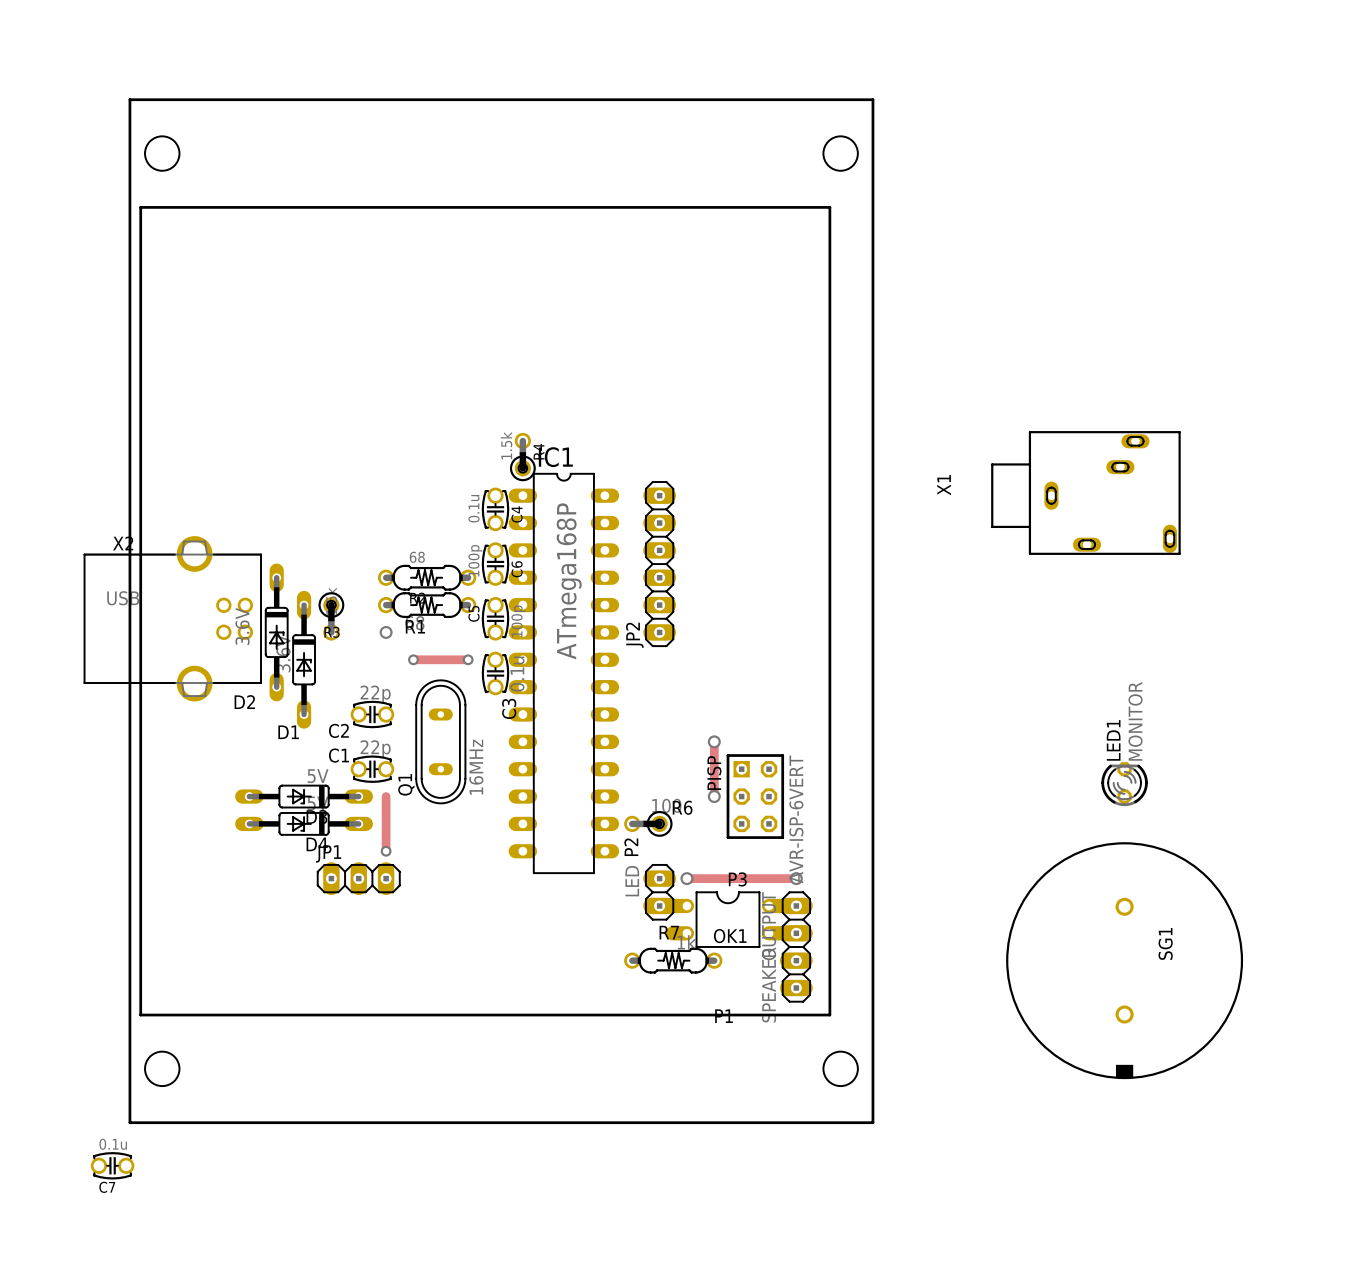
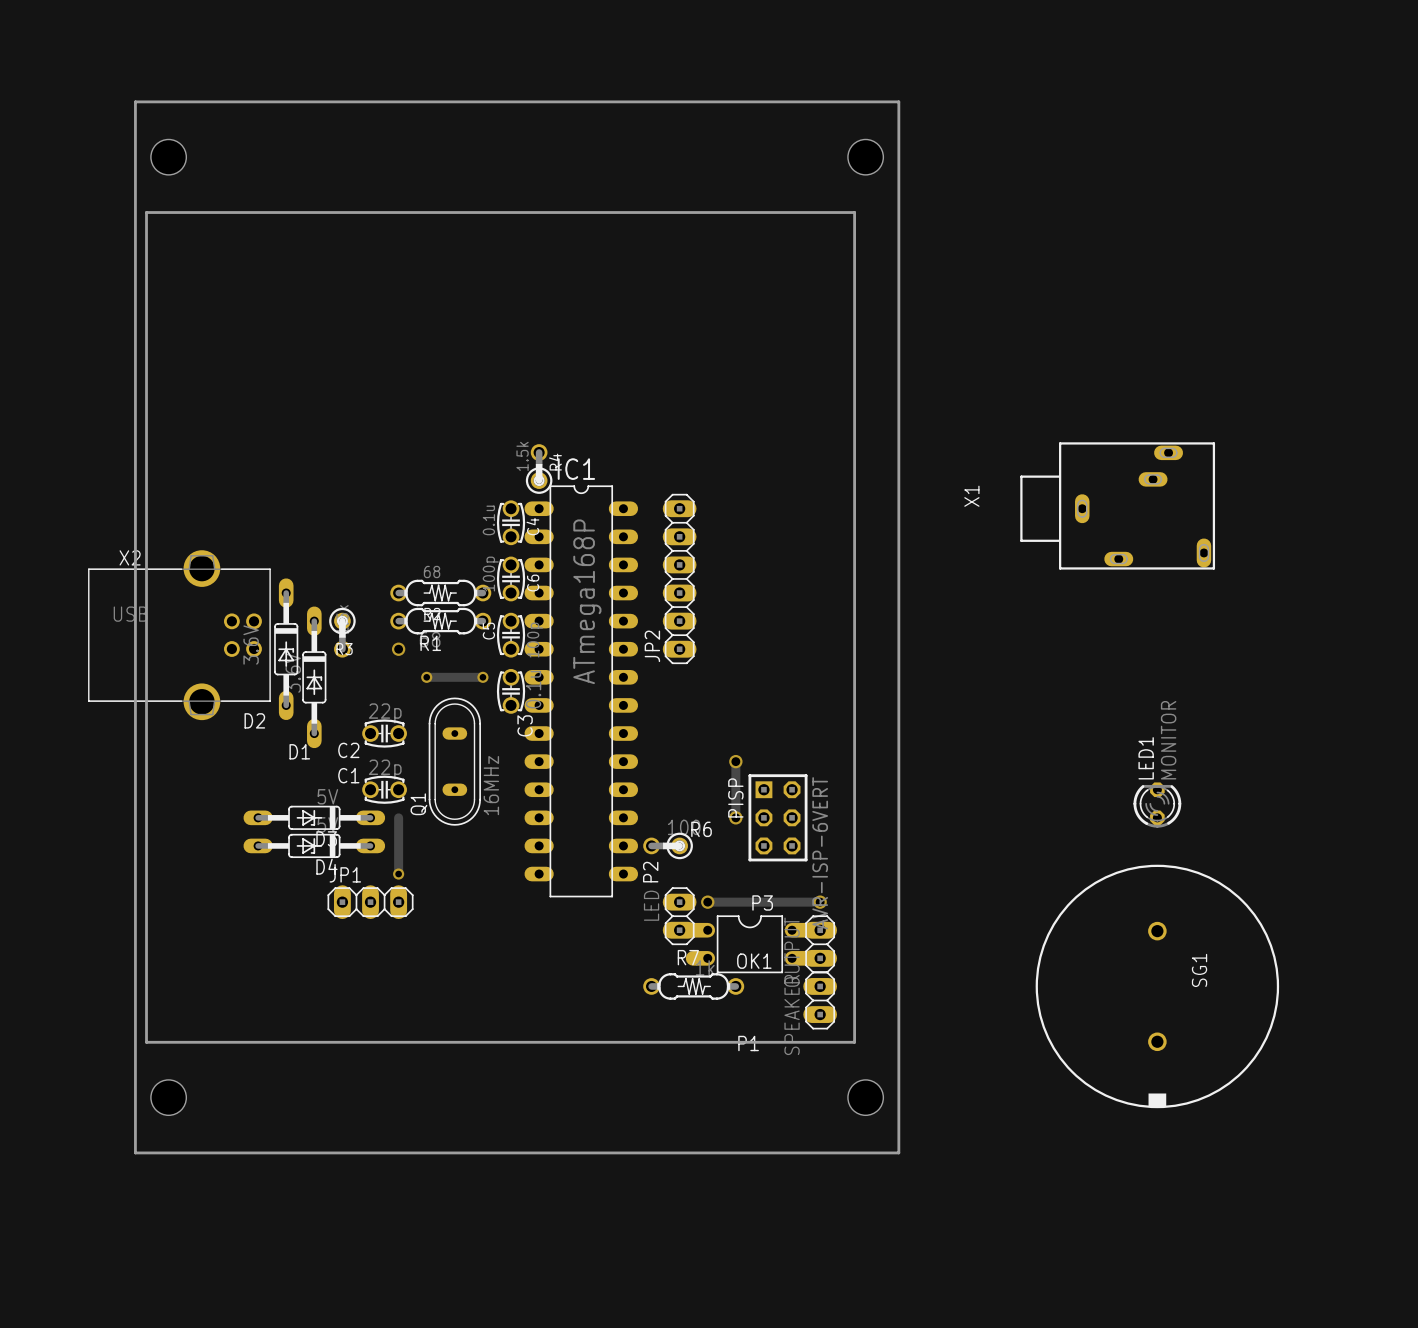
C7: 0.1u (112, 1165) -> none

